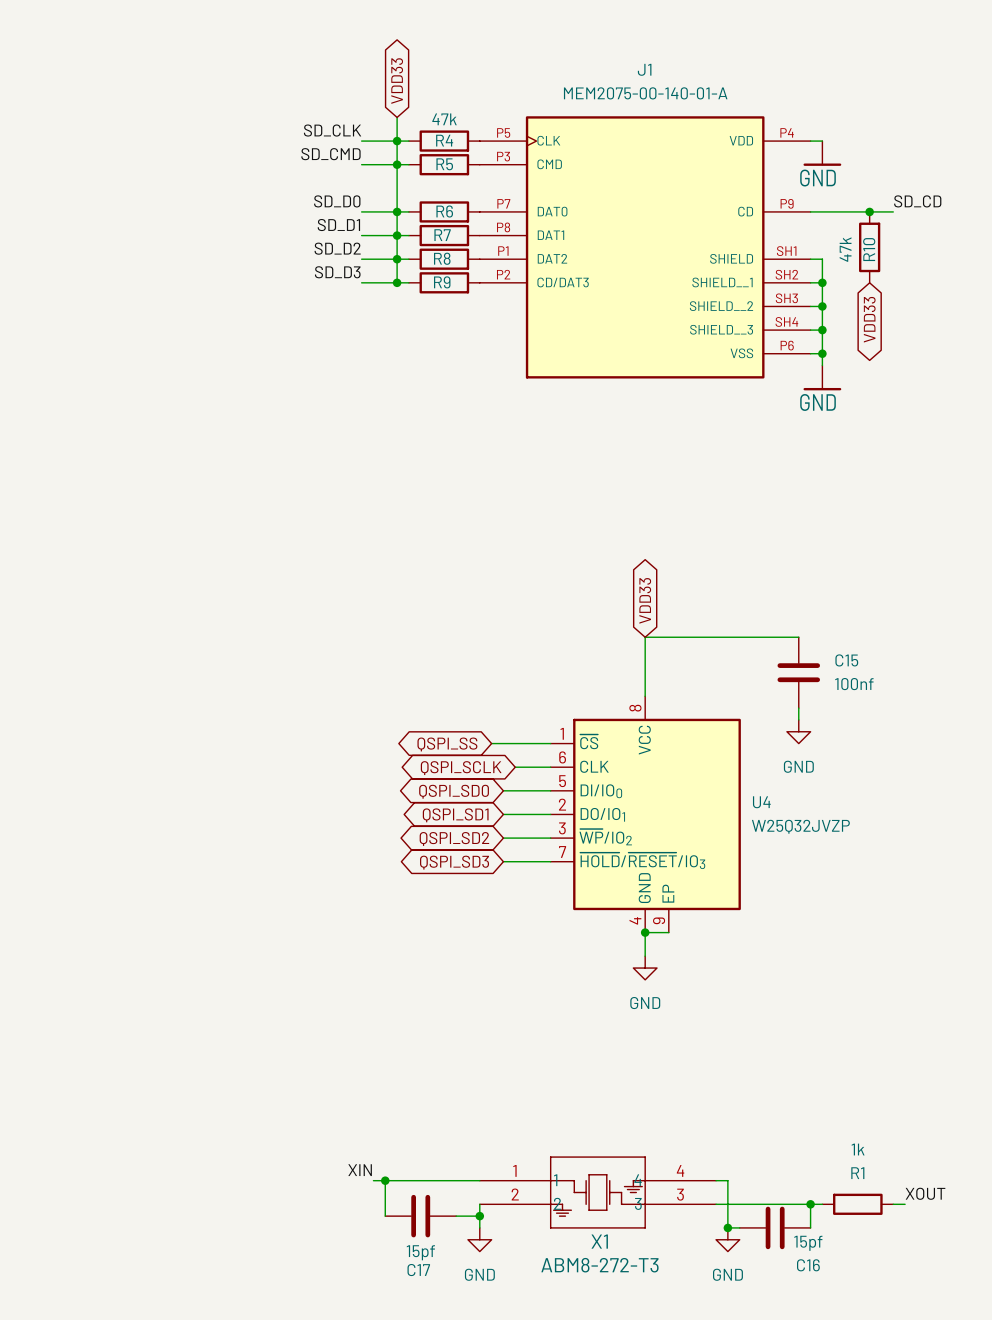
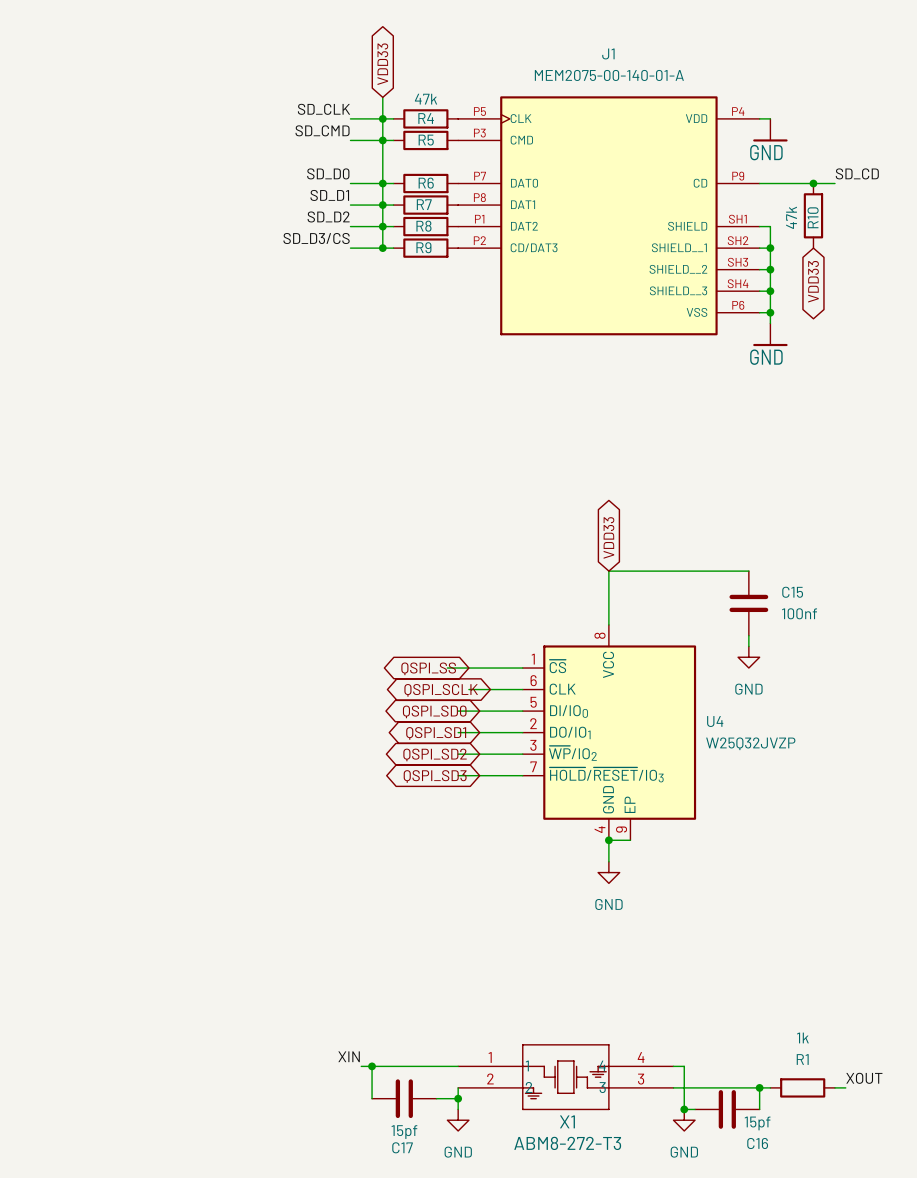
label: SD_D3 (337, 272) -> SD_D3/CS (316, 238)
wire: none -> (447, 668) (468, 668)
wire: none -> (468, 689) (490, 689)
wire: none -> (458, 711) (479, 711)
wire: none -> (458, 732) (479, 732)
wire: none -> (458, 754) (479, 754)
wire: none -> (458, 775) (479, 775)

